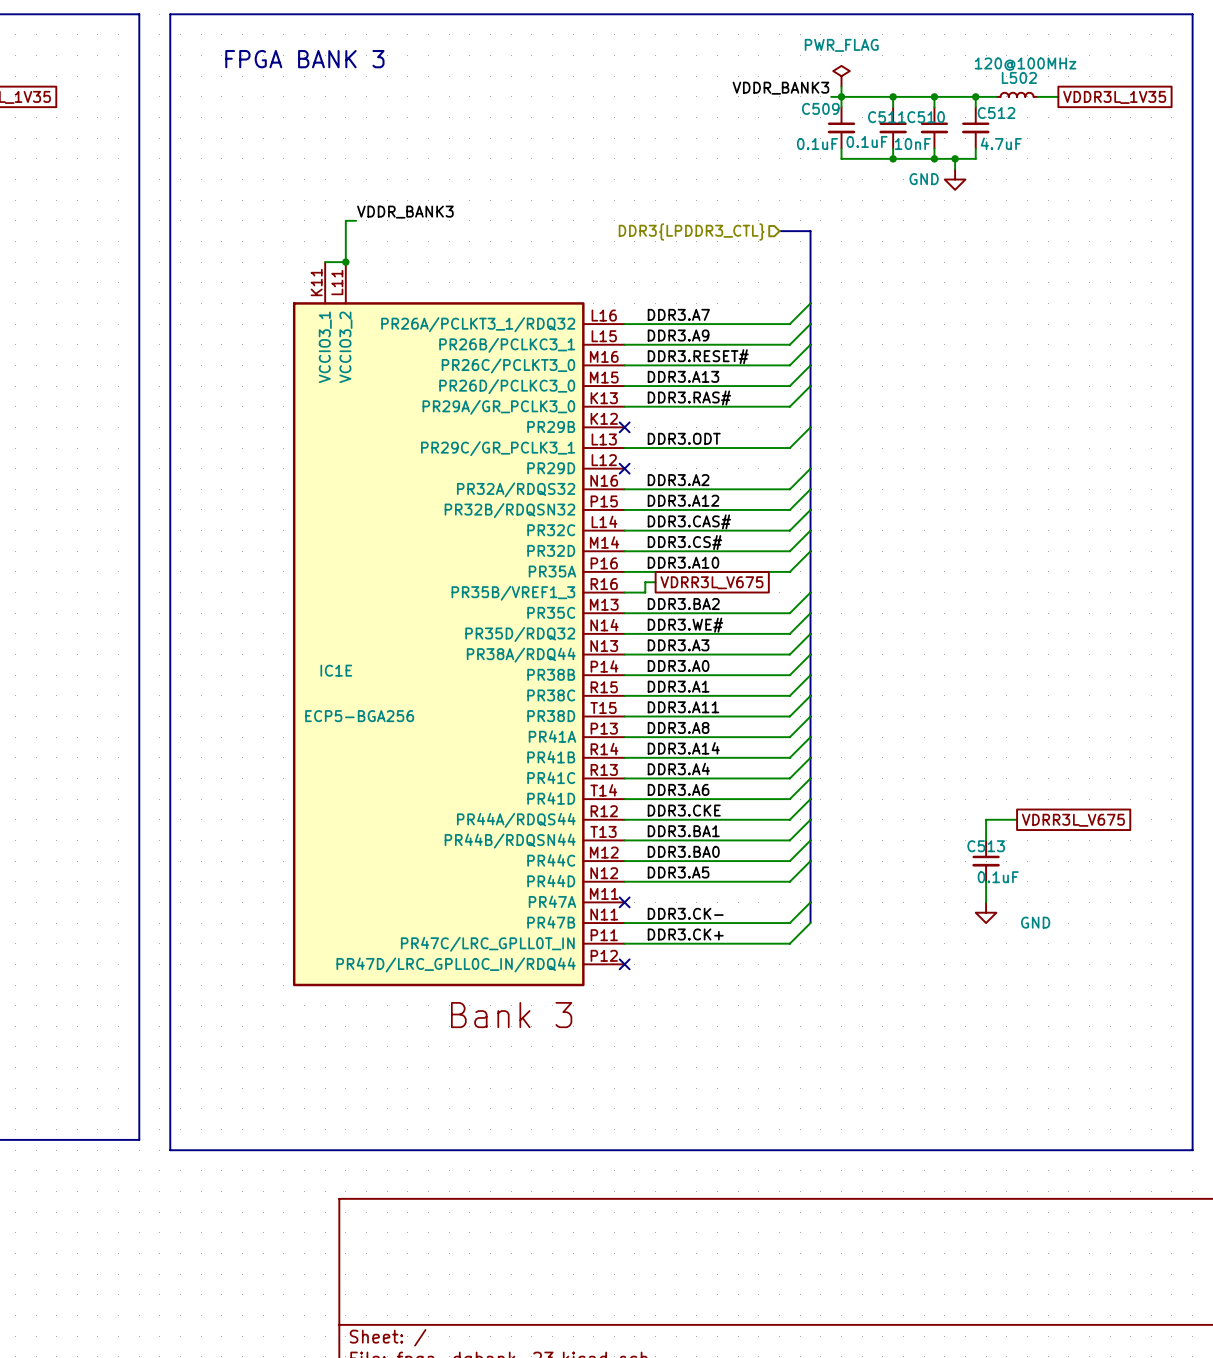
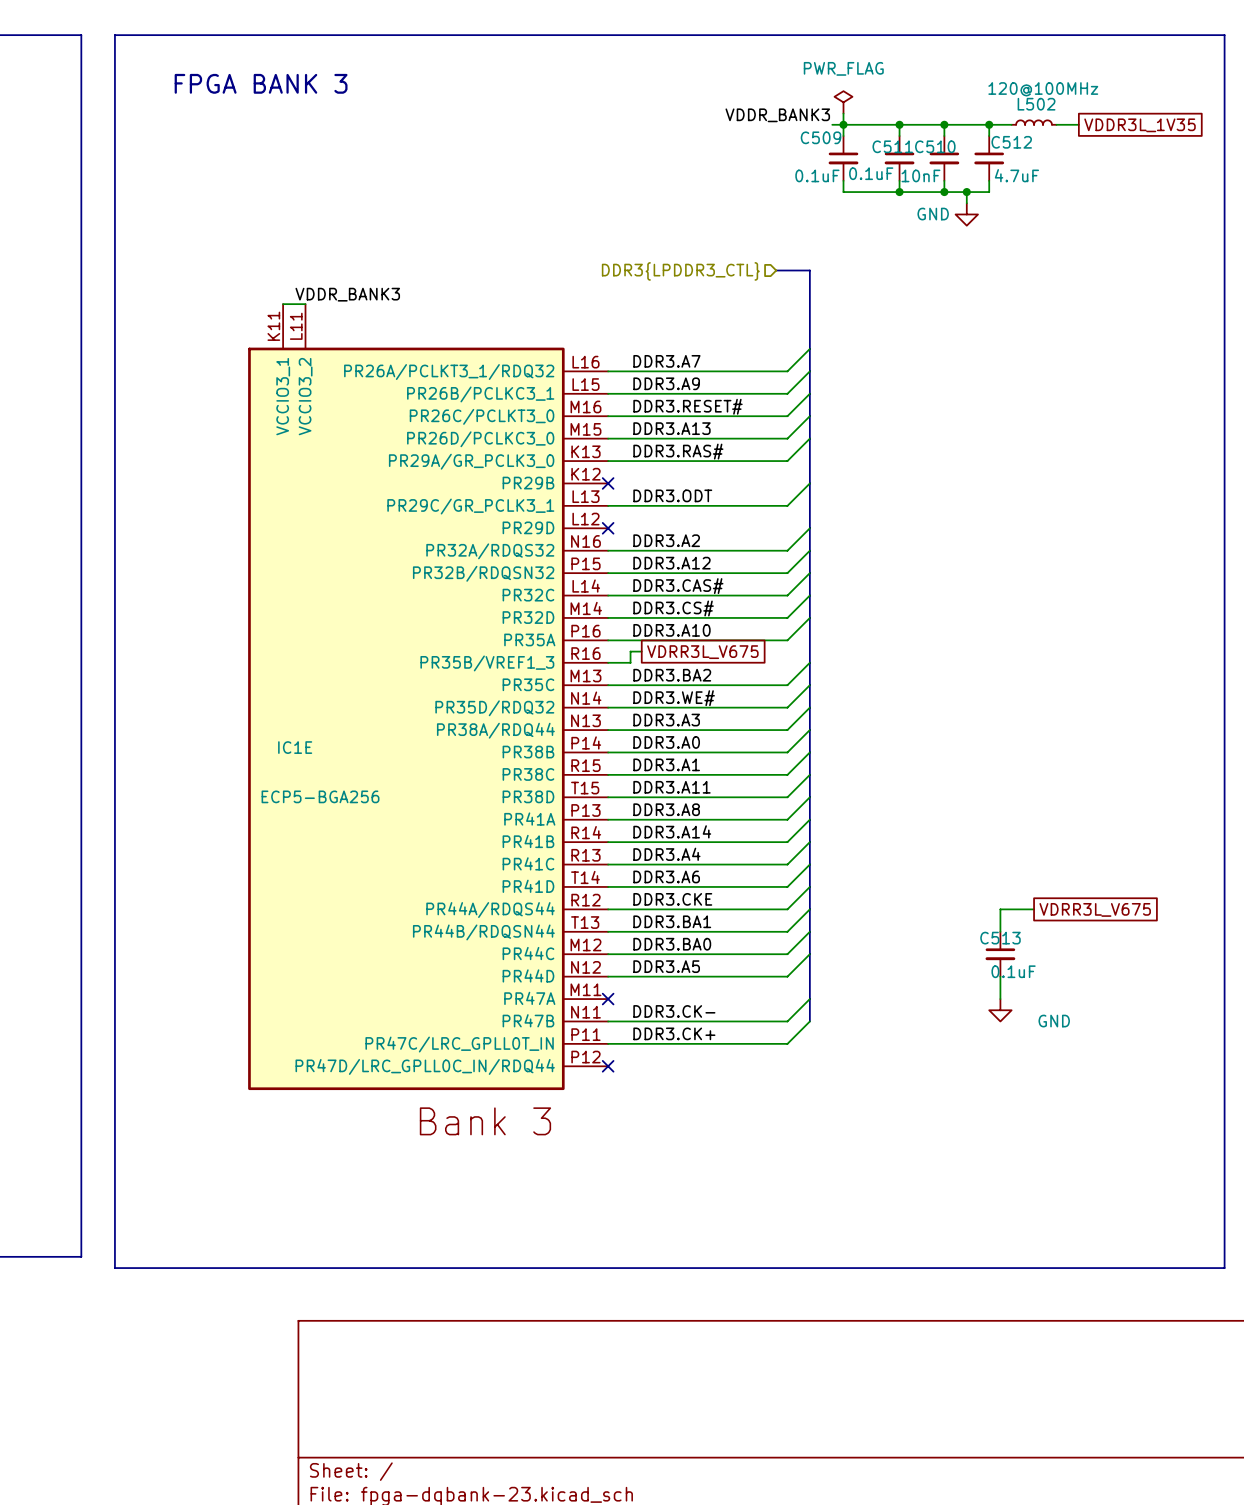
label position: VDDR_BANK3 (405, 212) -> VDDR_BANK3 (347, 294)
wire: (356, 220) (345, 220) (345, 262) -> none
junction: (345, 262) -> none

